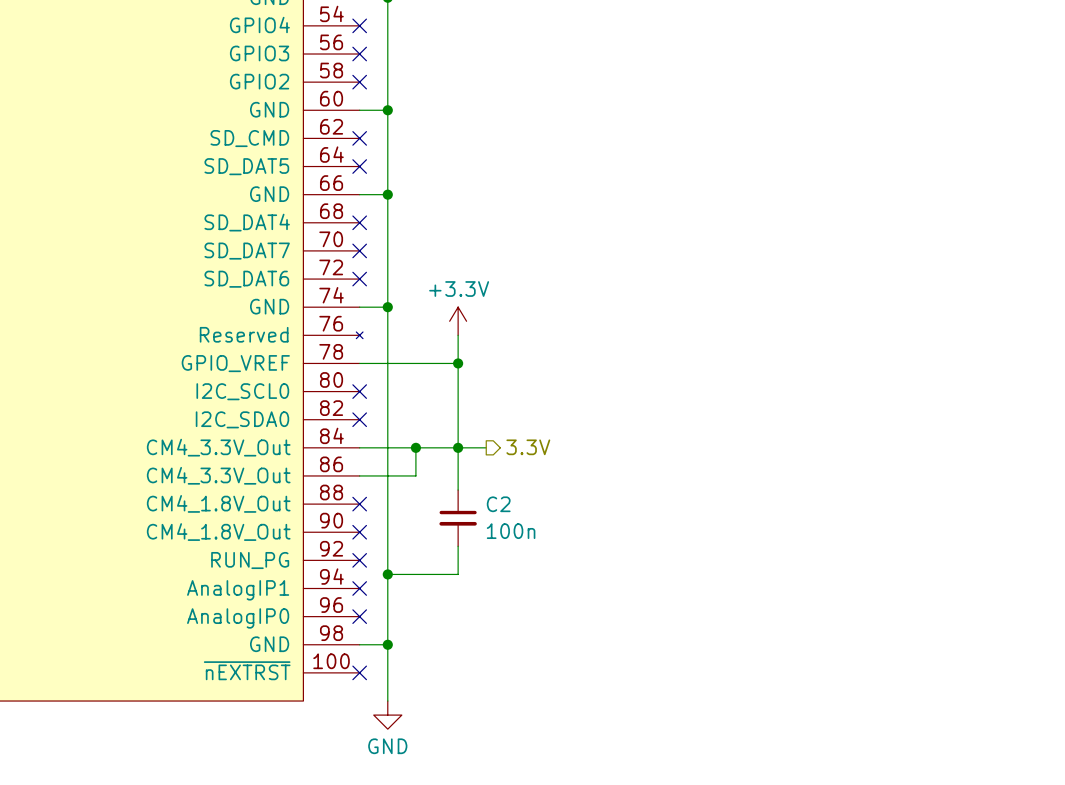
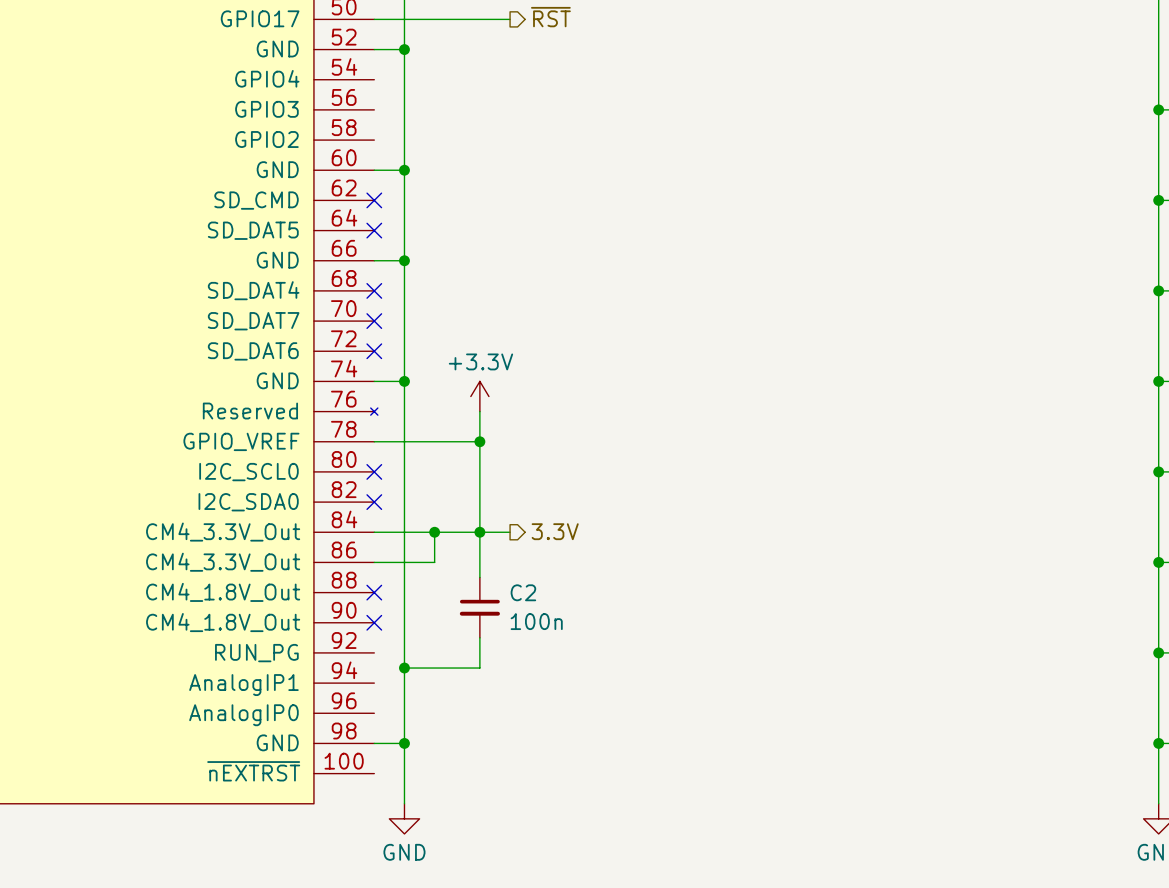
no-connect mark: (359, 25) -> none
no-connect mark: (359, 54) -> none
no-connect mark: (359, 82) -> none
no-connect mark: (359, 560) -> none
no-connect mark: (359, 588) -> none
no-connect mark: (359, 616) -> none
no-connect mark: (359, 672) -> none

